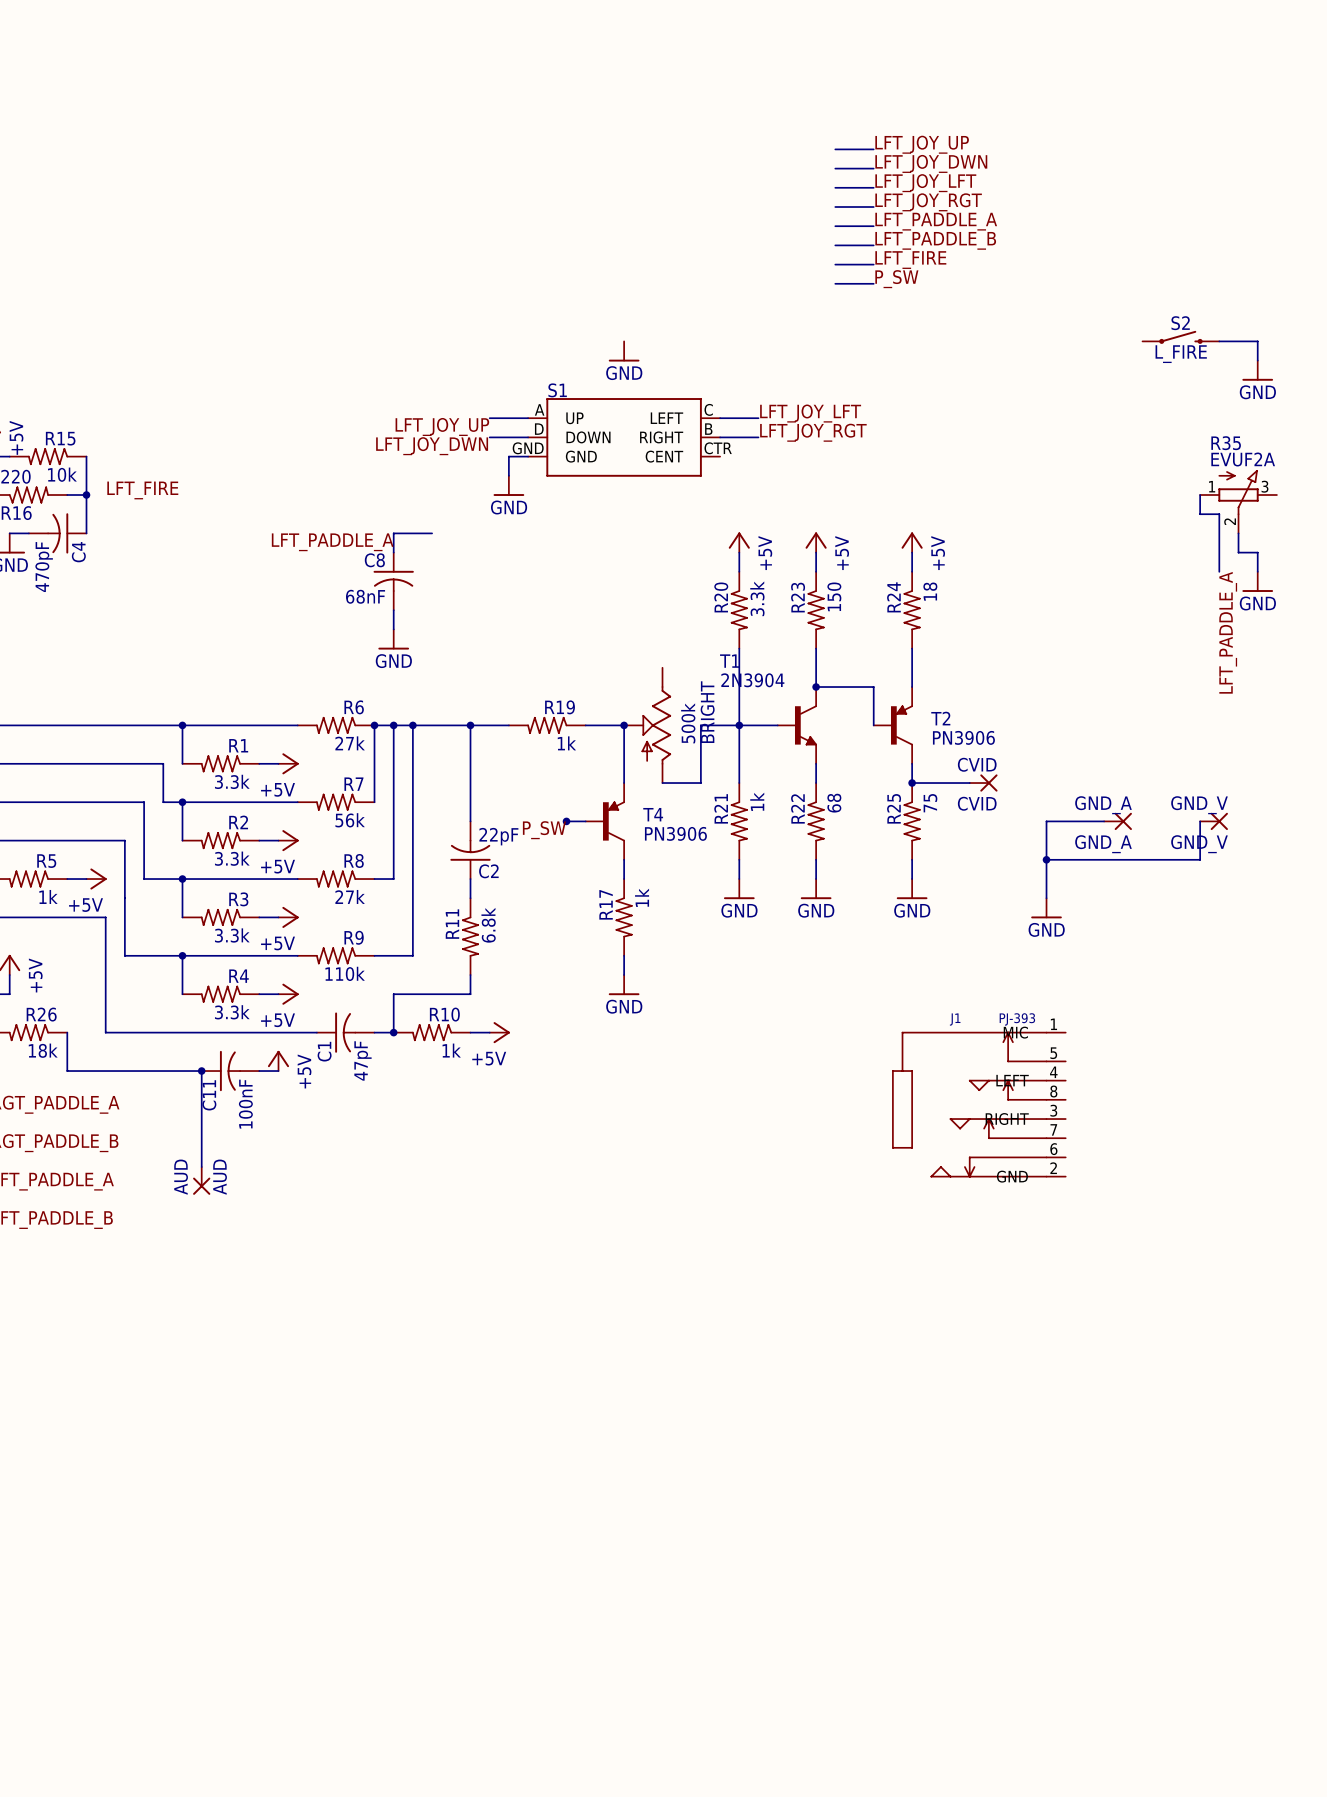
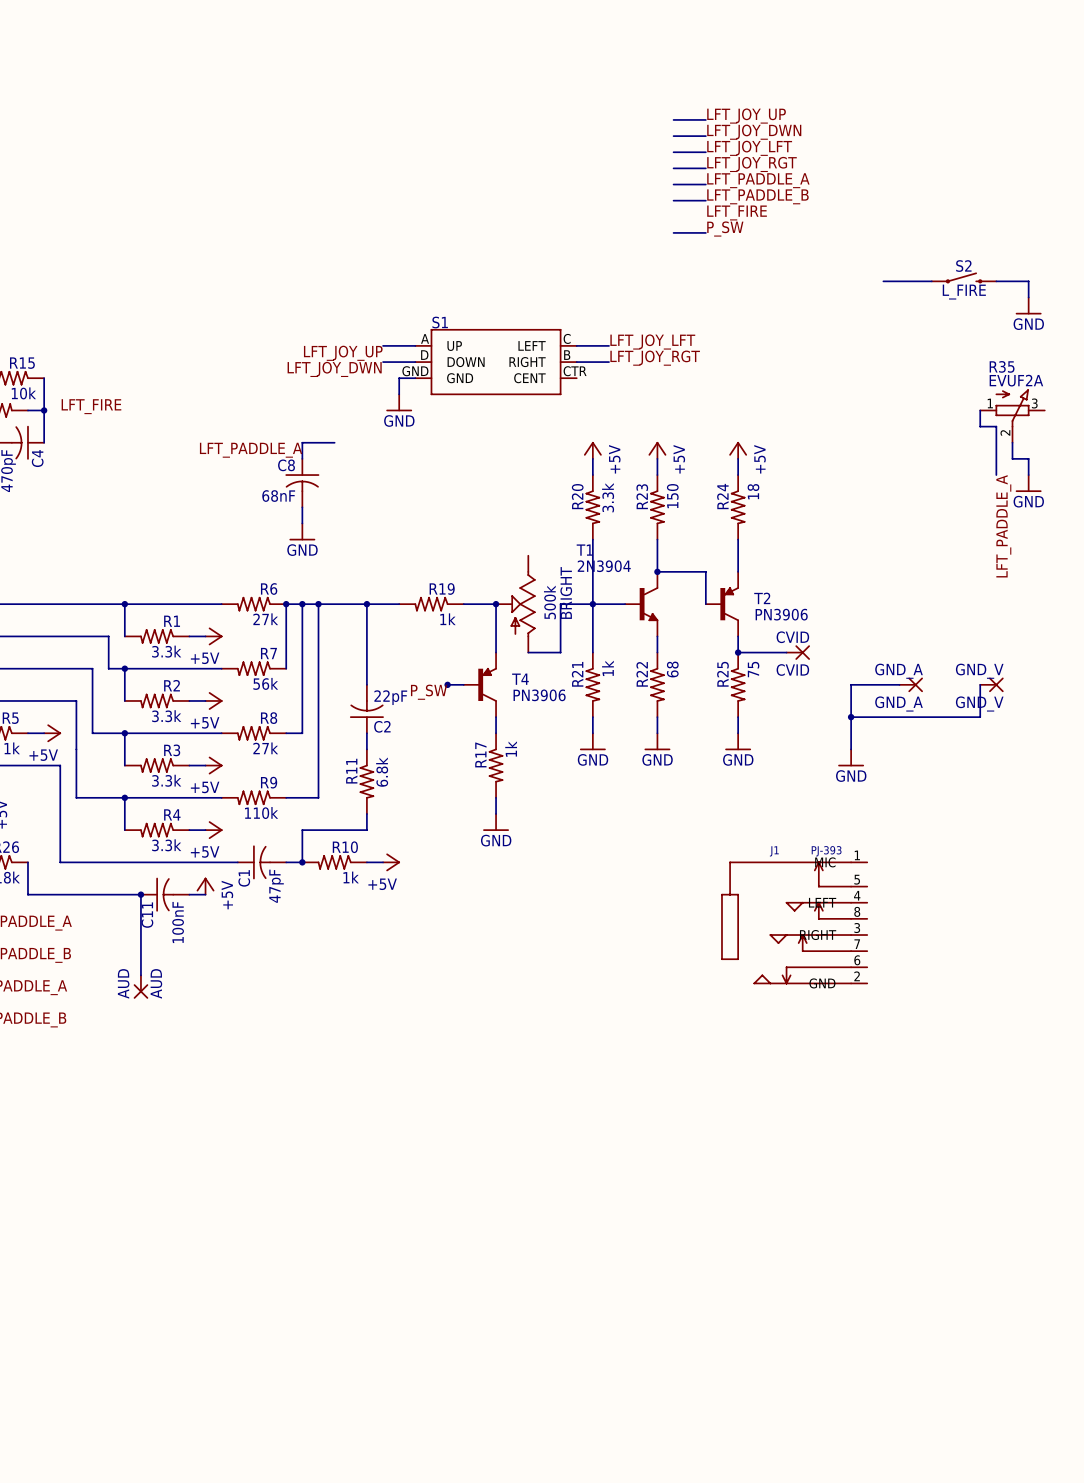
wire: (835, 264) (873, 264) -> none
wire: none -> (883, 281) (931, 281)
power symbol: GND (624, 351) -> none

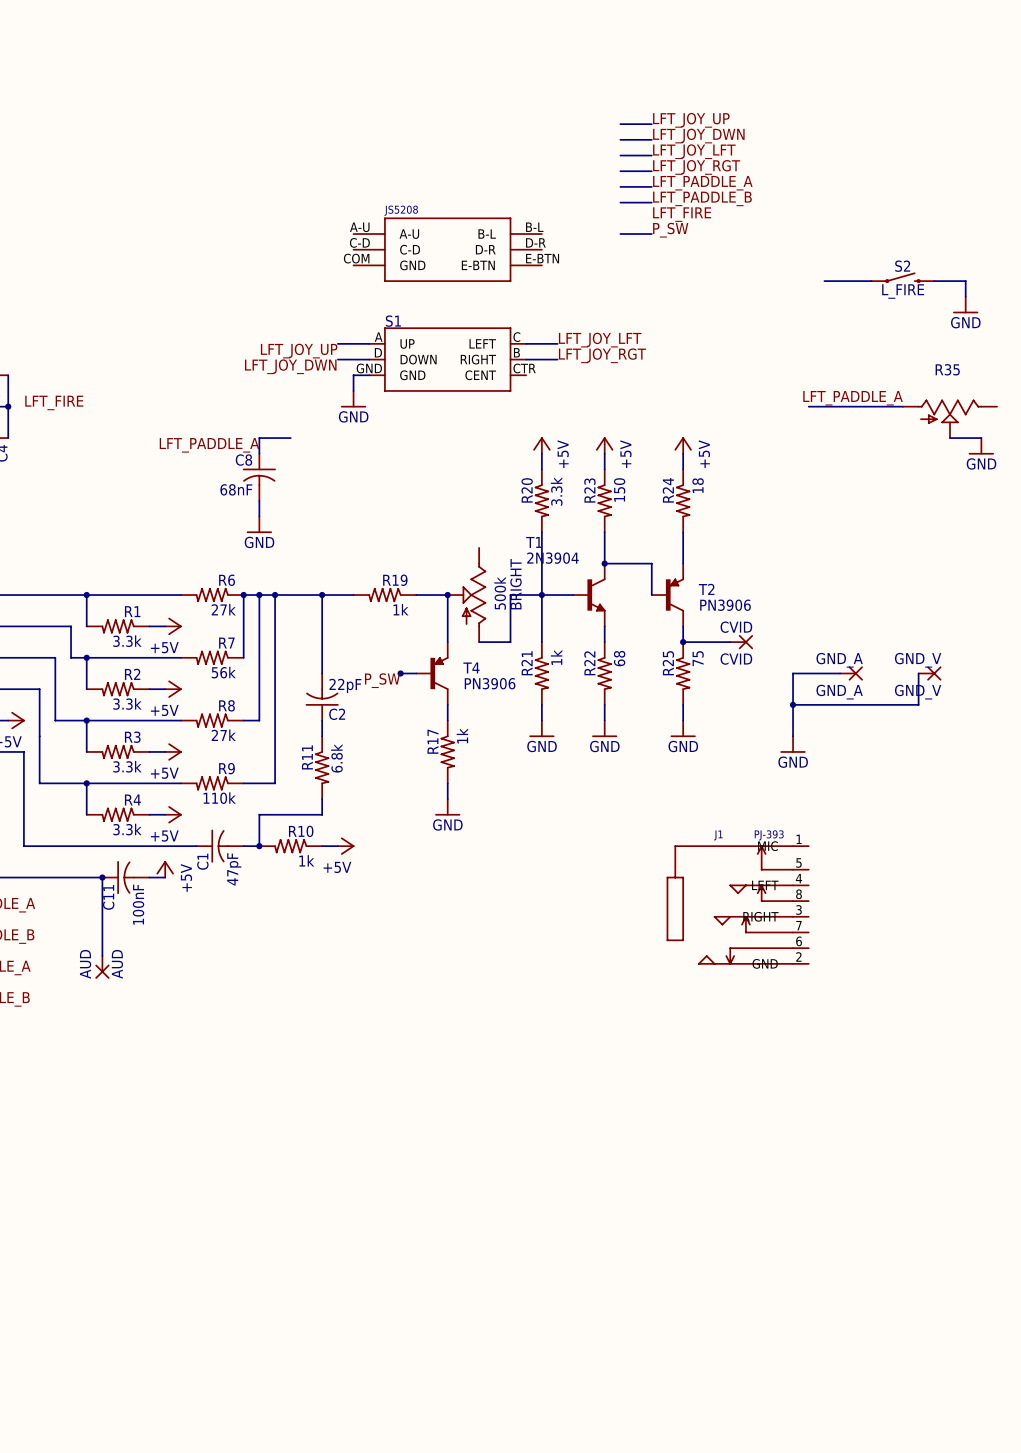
part: none -> (447, 249)
R35 value: EVUF2A (1016, 380) -> none
R35 symbol: [980, 389, 1045, 443] -> [902, 399, 998, 439]
wire: none -> (808, 406) (902, 406)
wire: (980, 410) (980, 426) (996, 426) (996, 475) -> none
wire: (1012, 442) (1012, 458) (1028, 458) (1028, 475) -> (949, 438) (981, 438)
power symbol position: GND (1028, 483) -> GND (981, 446)
label rotation: 0° (1003, 526) -> 90° clockwise (853, 398)
label position: LFT_PADDLE_A (1003, 526) -> LFT_PADDLE_A (853, 398)

